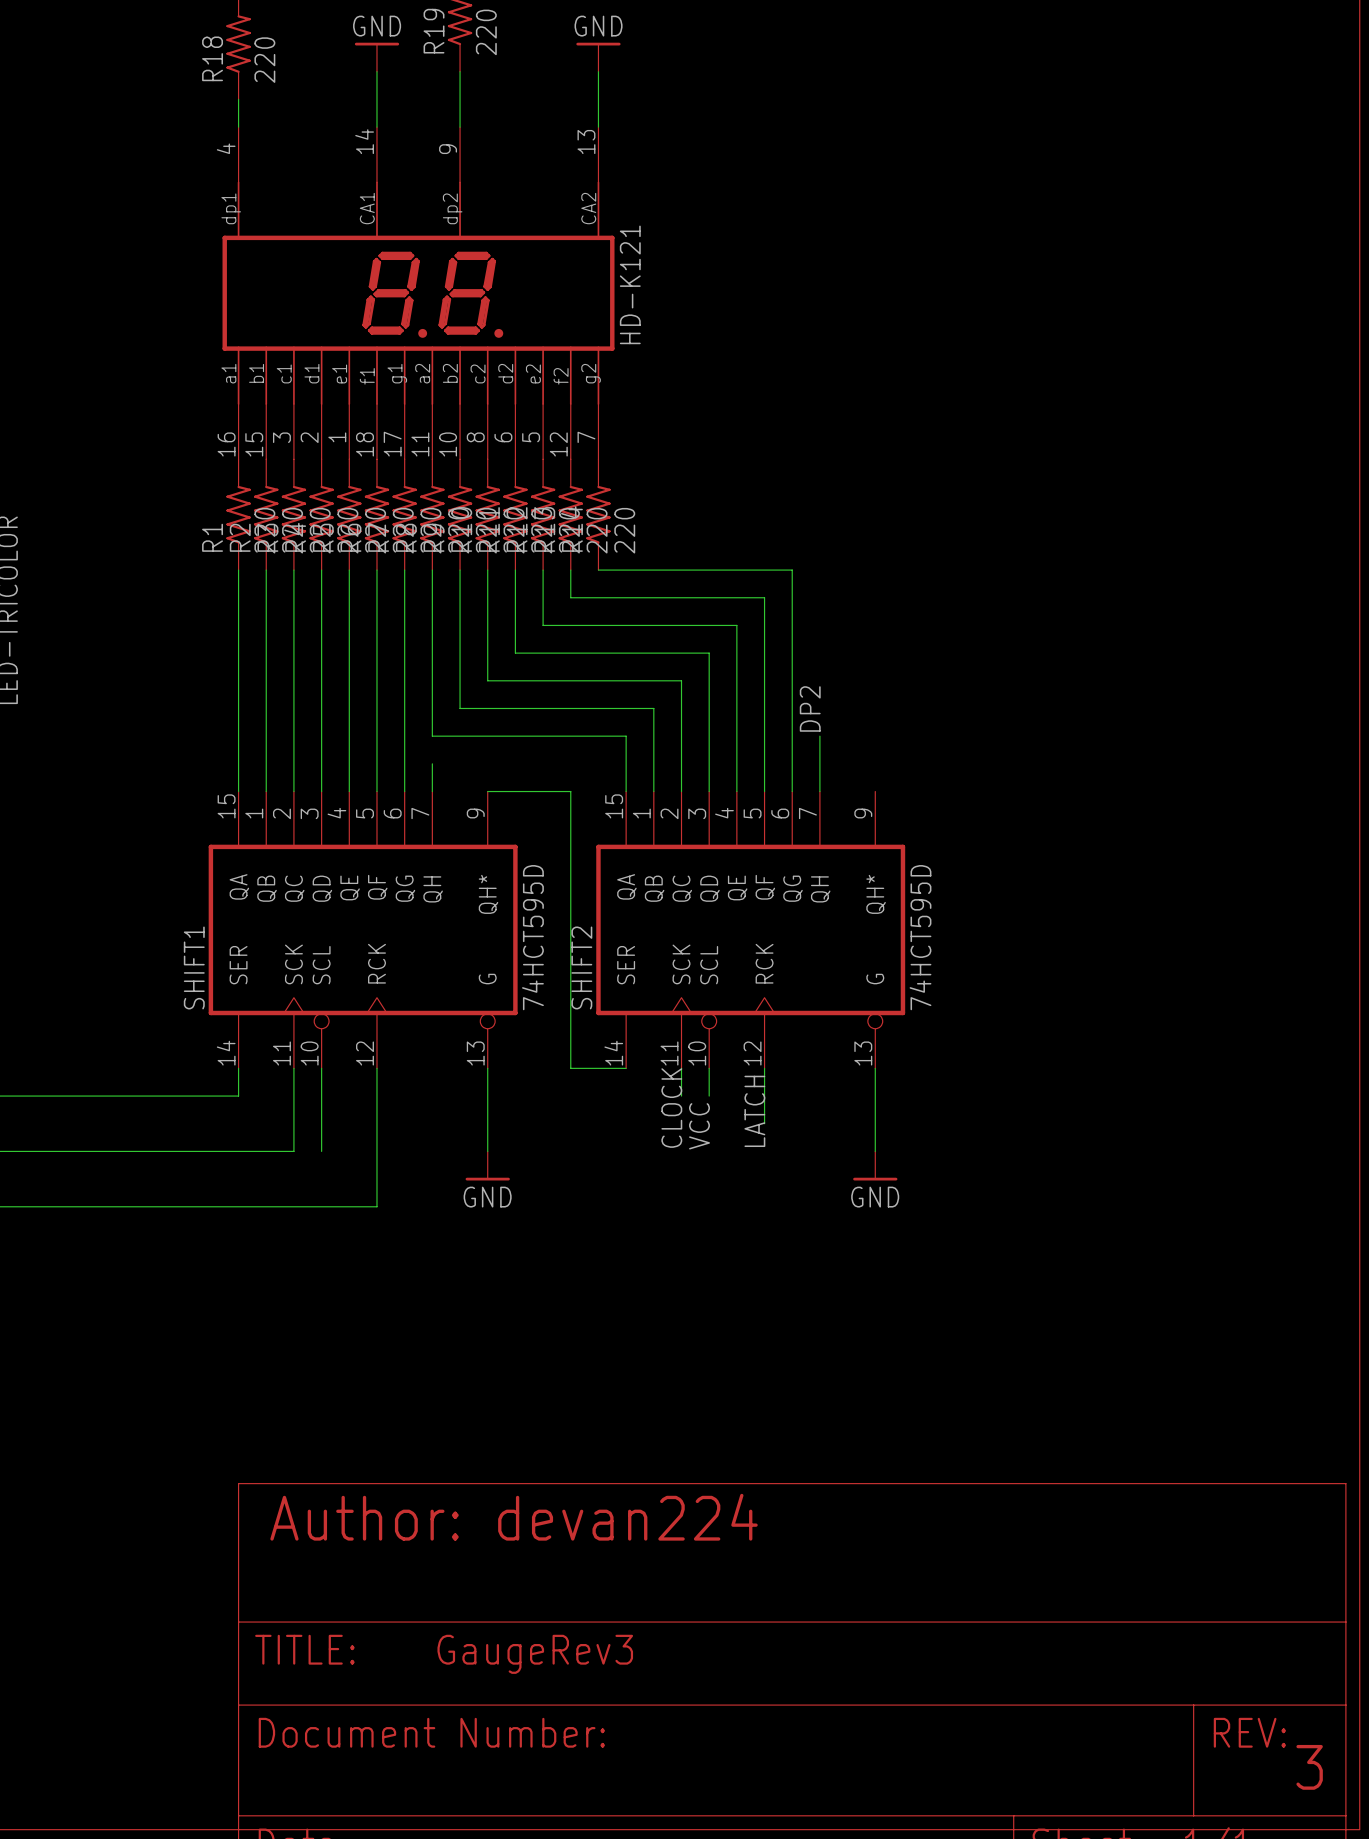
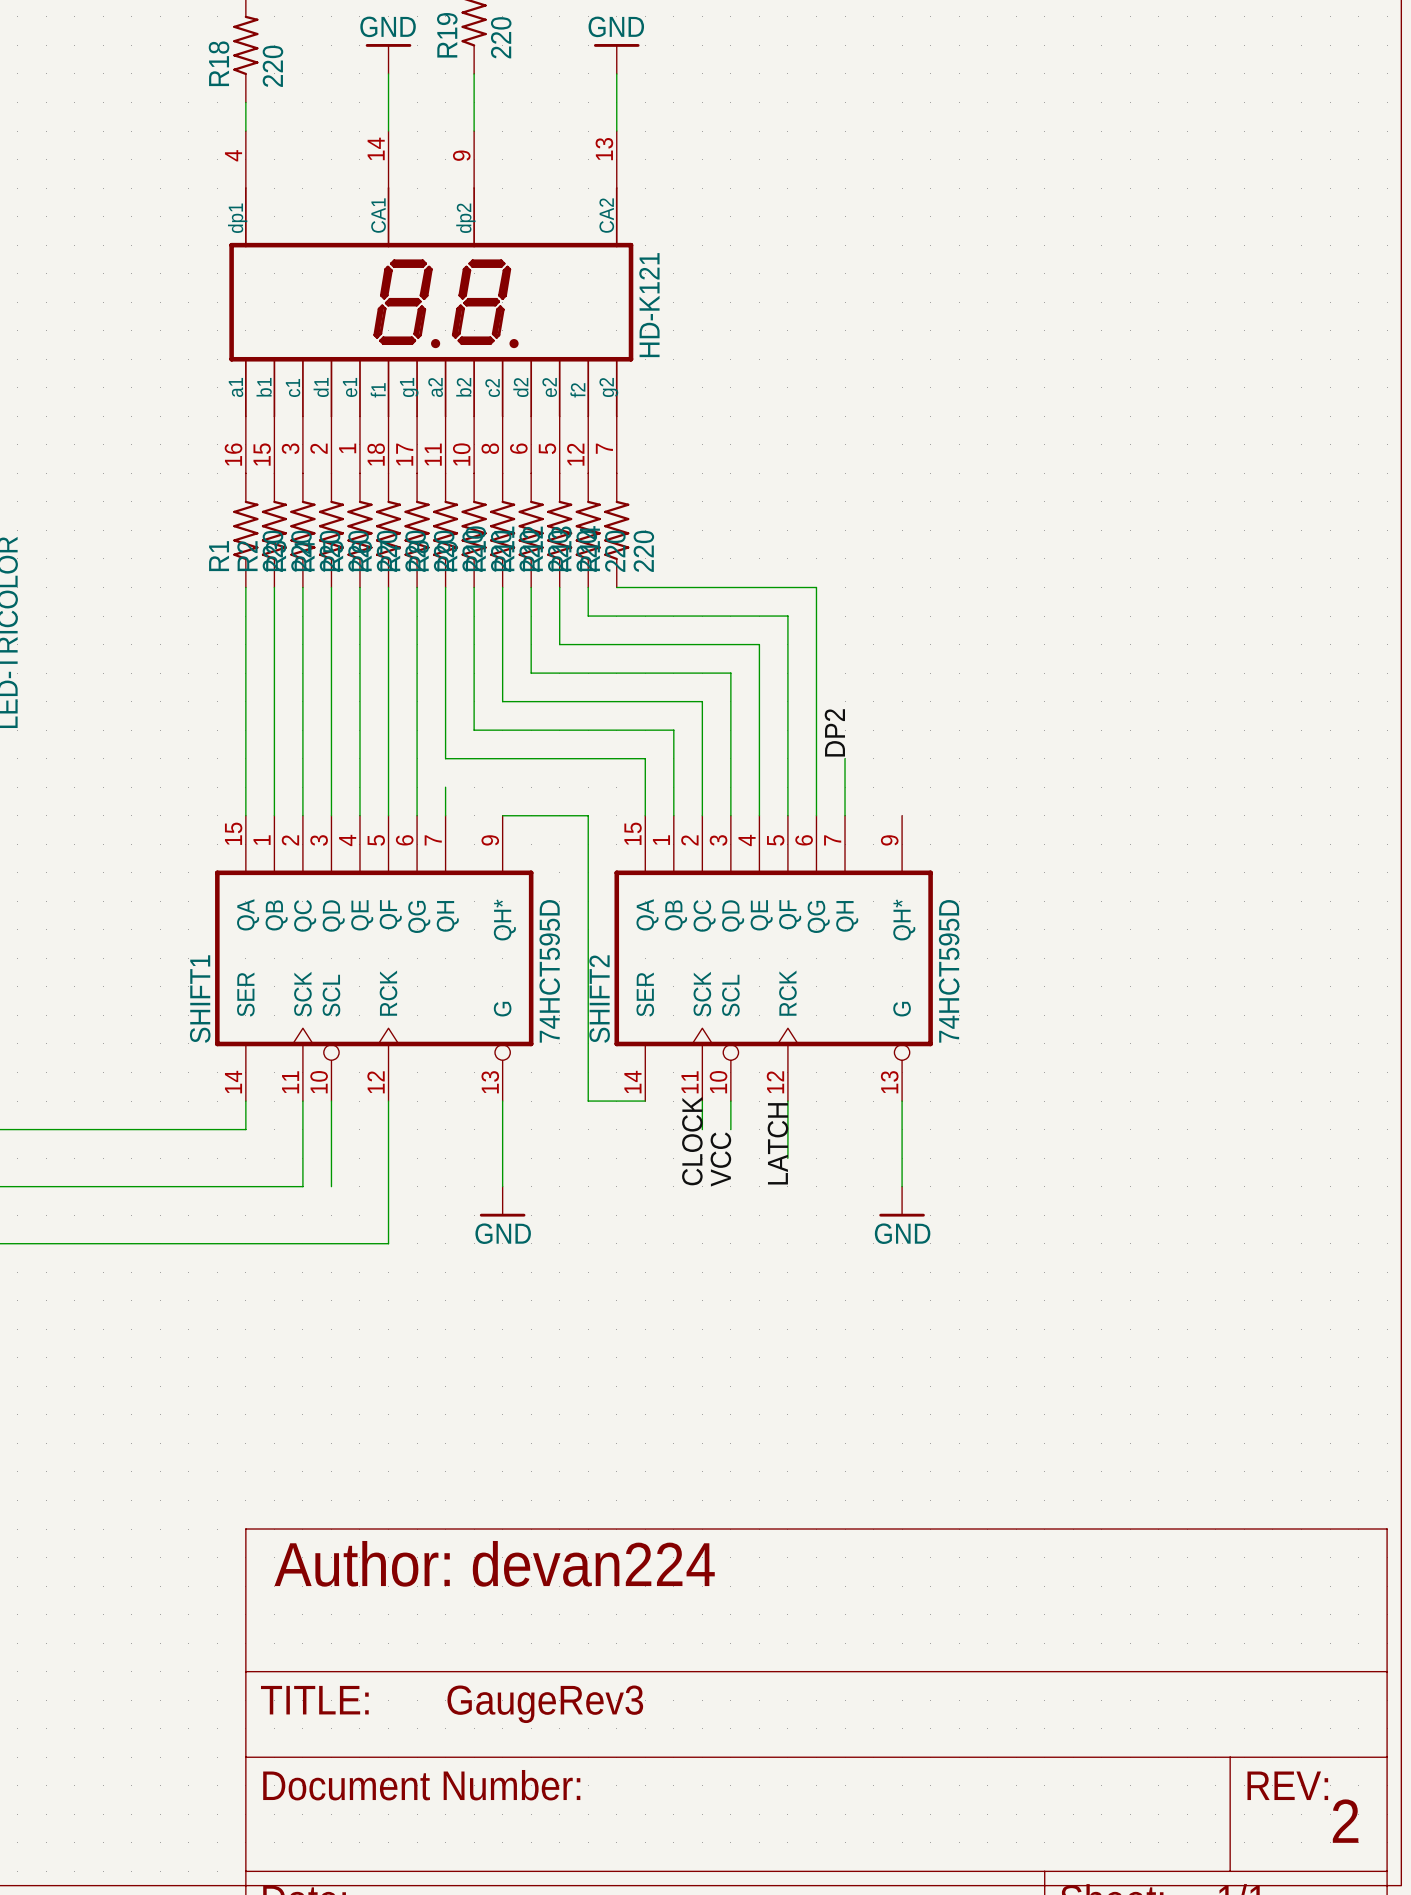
text: 3 (1309, 1767) -> 2 (1345, 1821)

